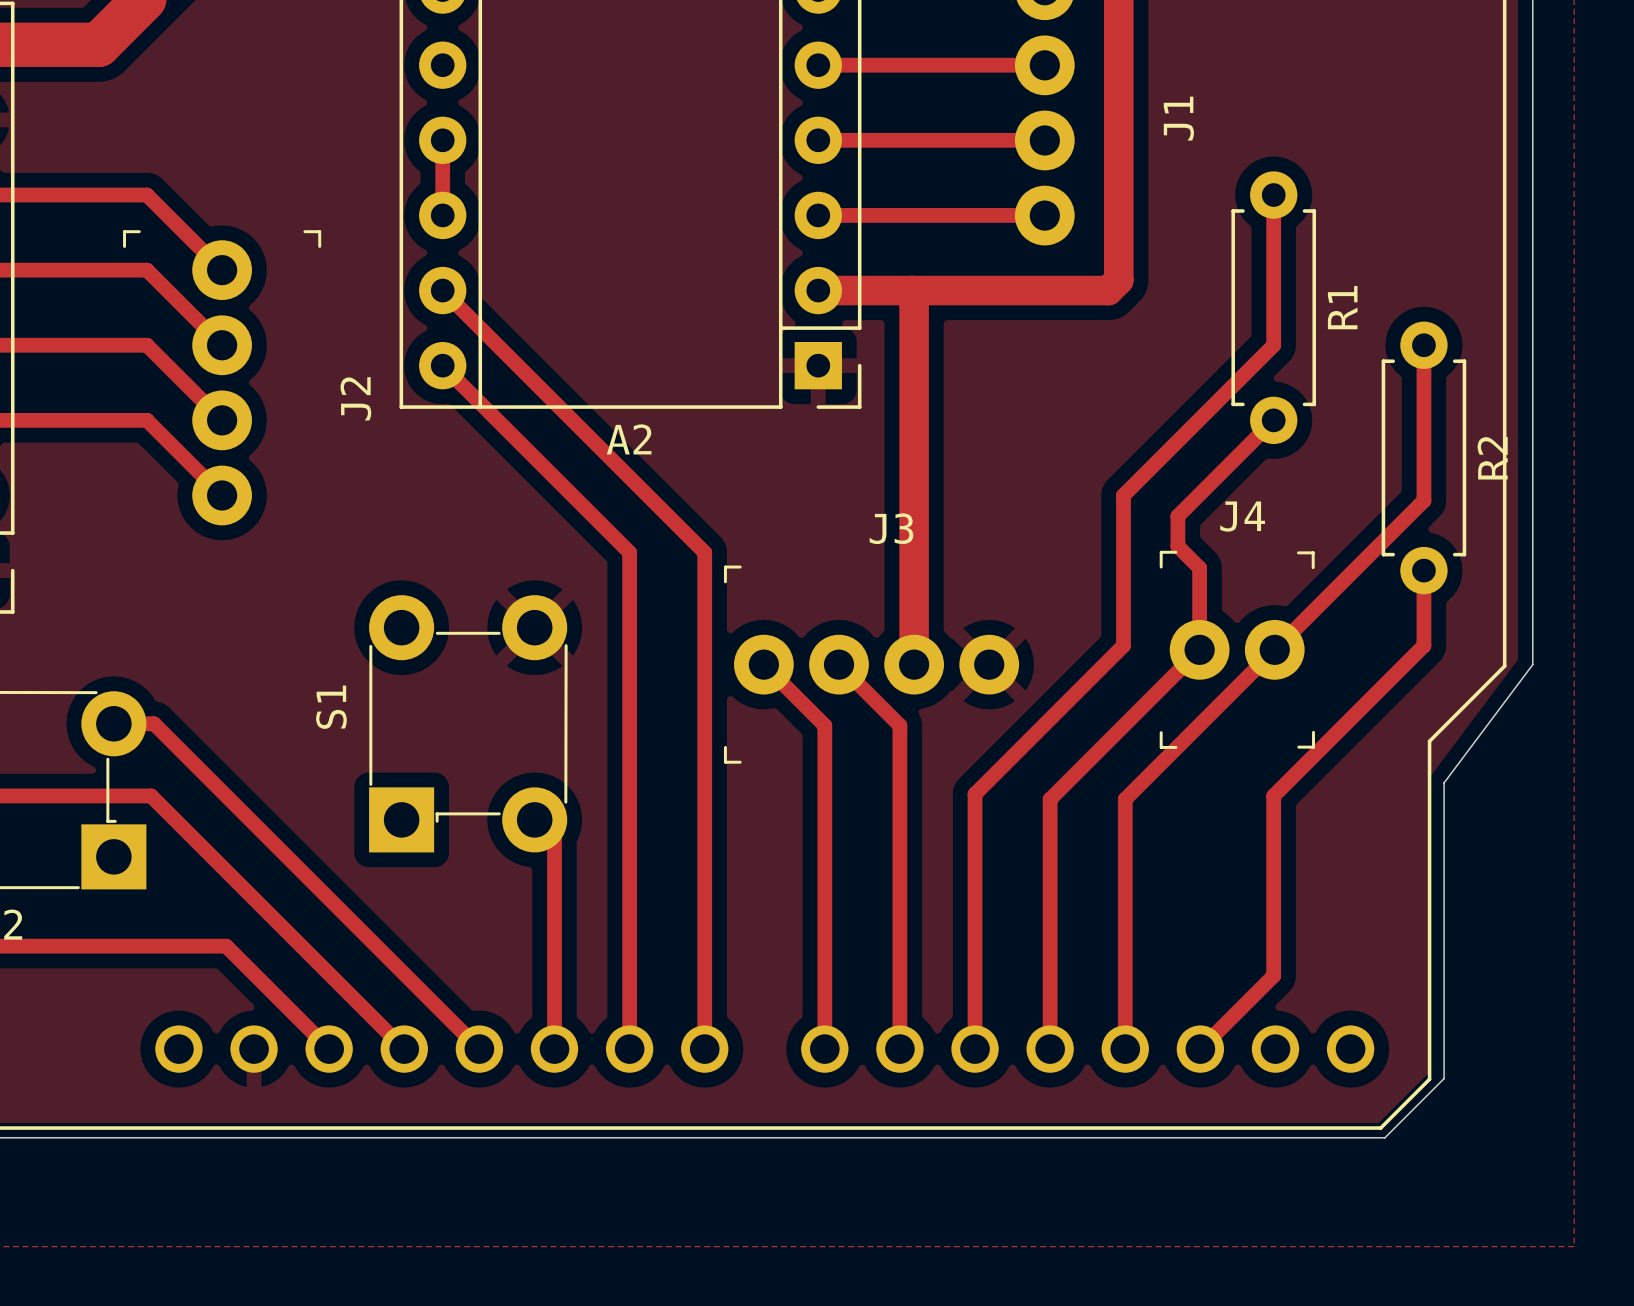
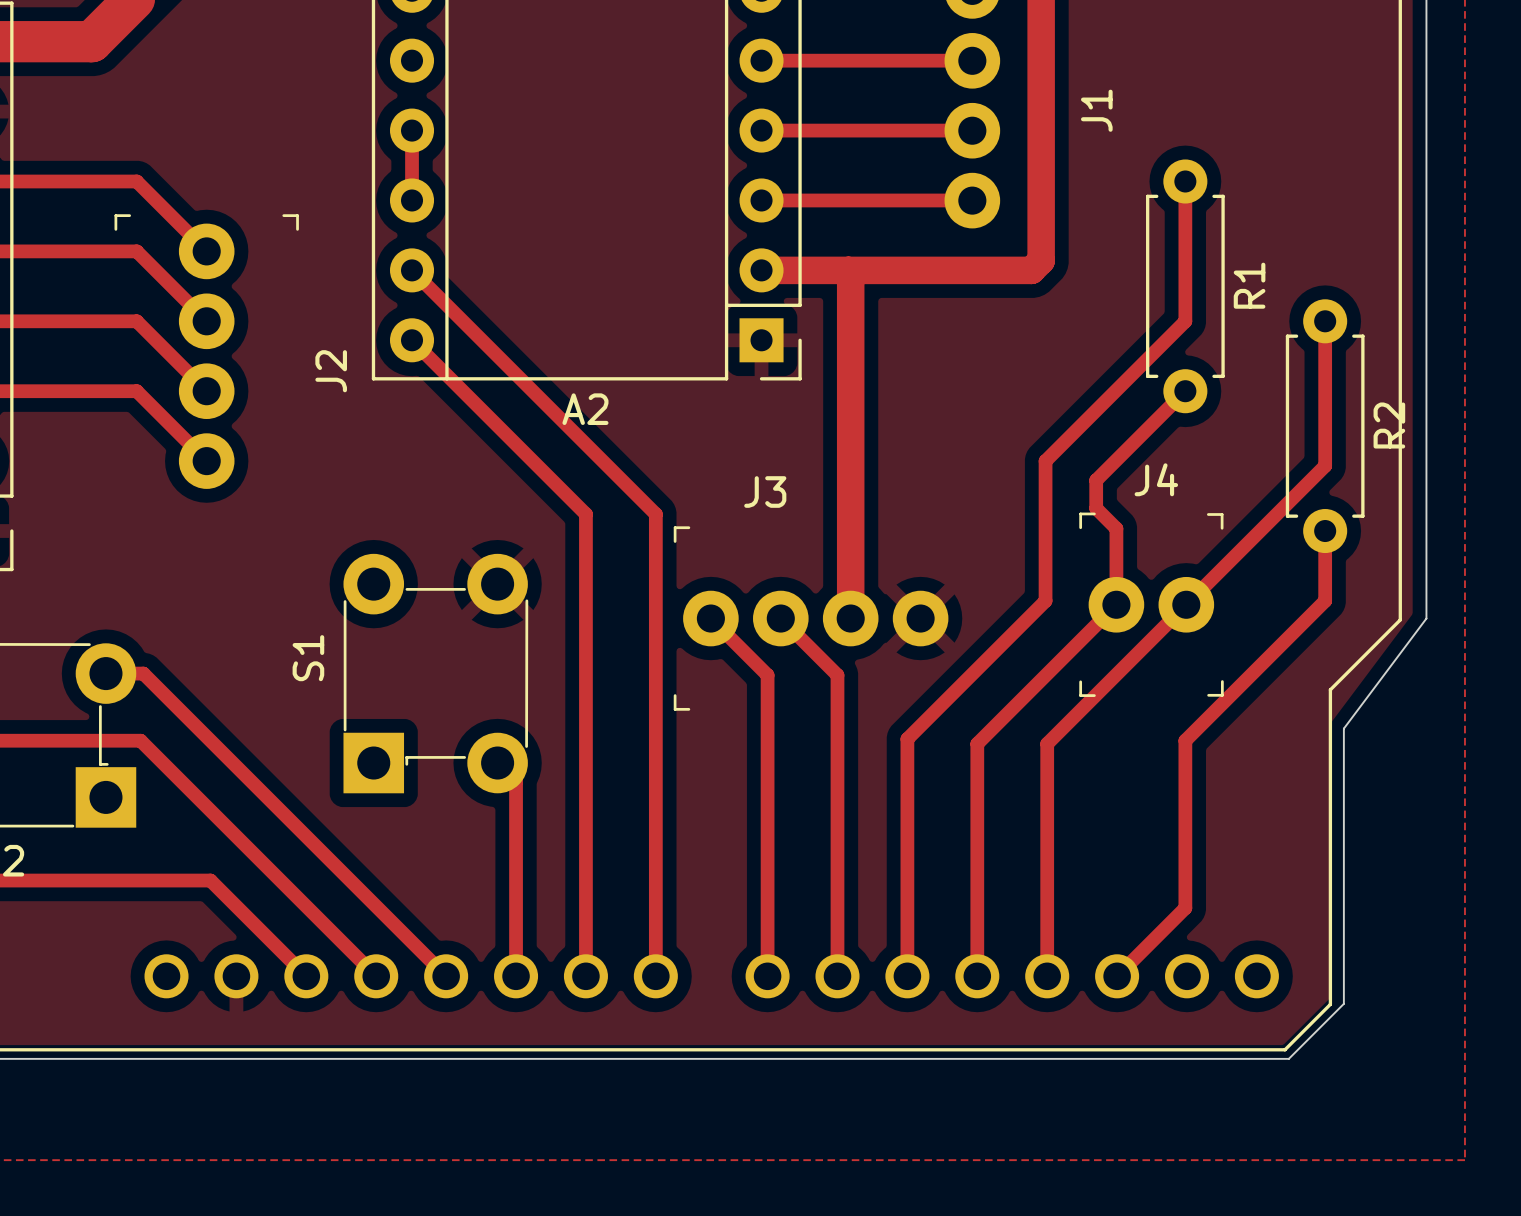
J3 name position: J3 (891, 528) -> J3 (765, 492)

